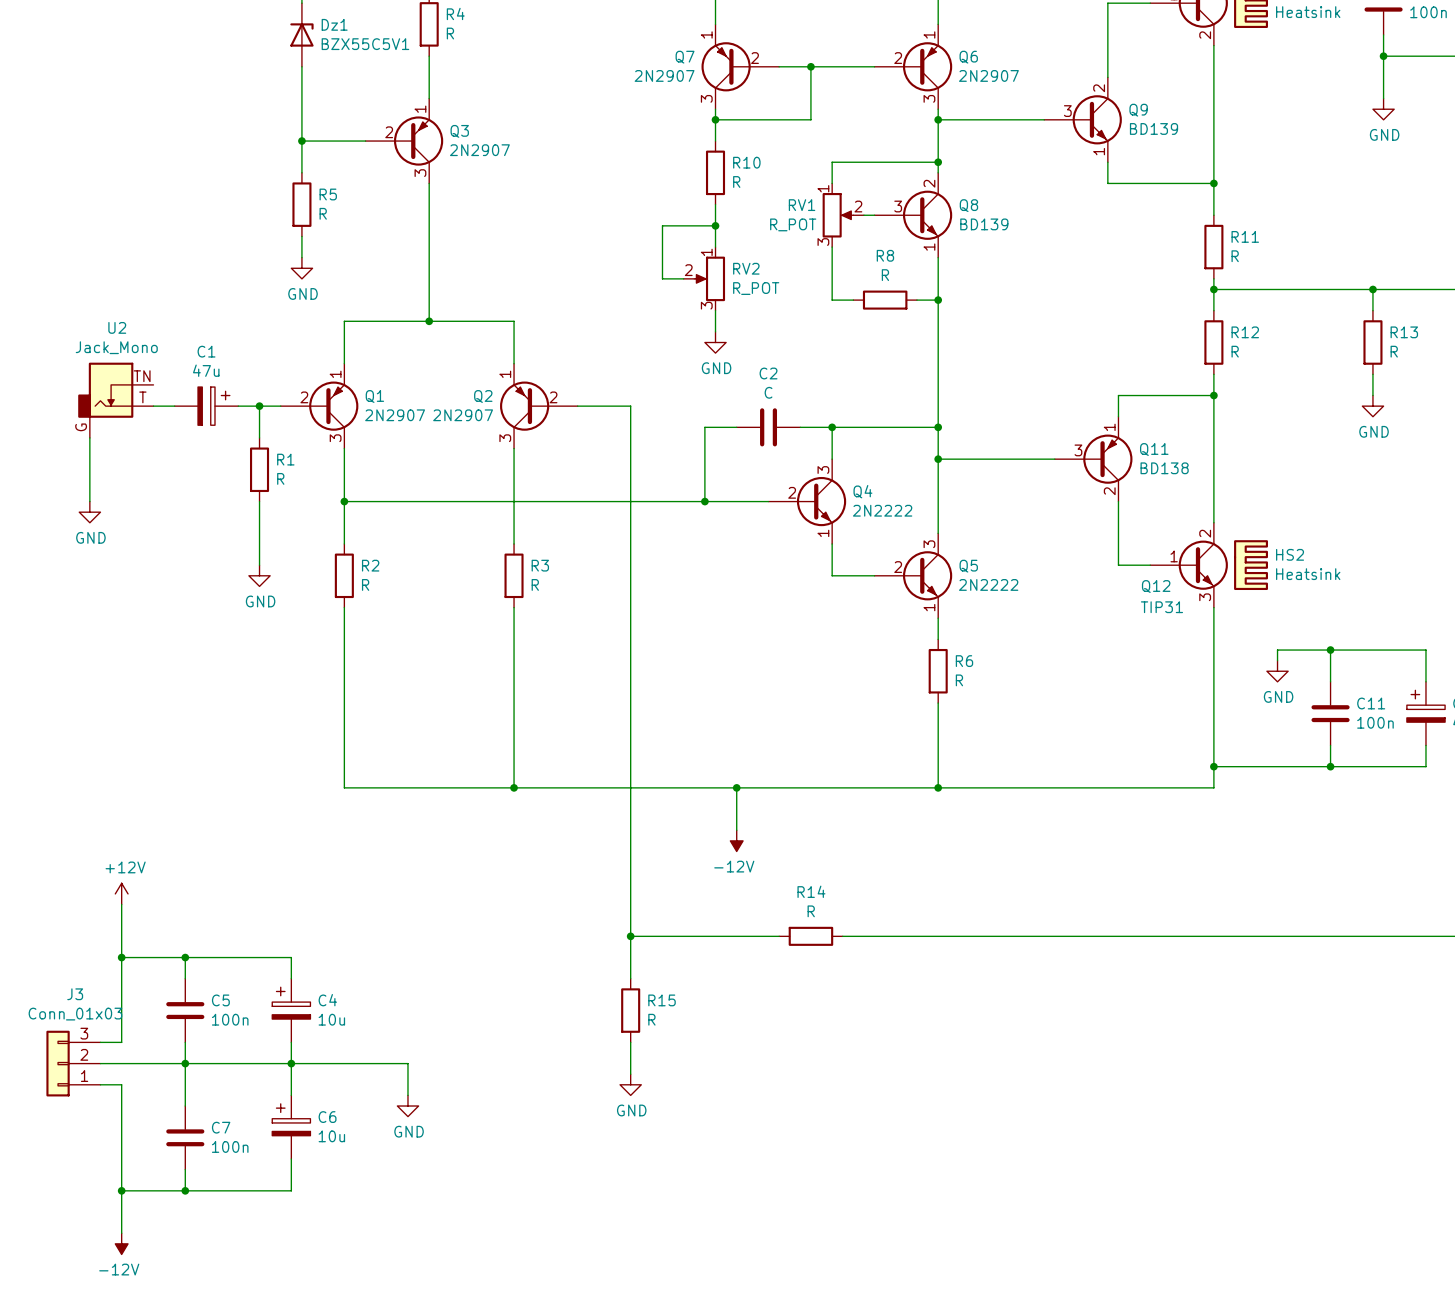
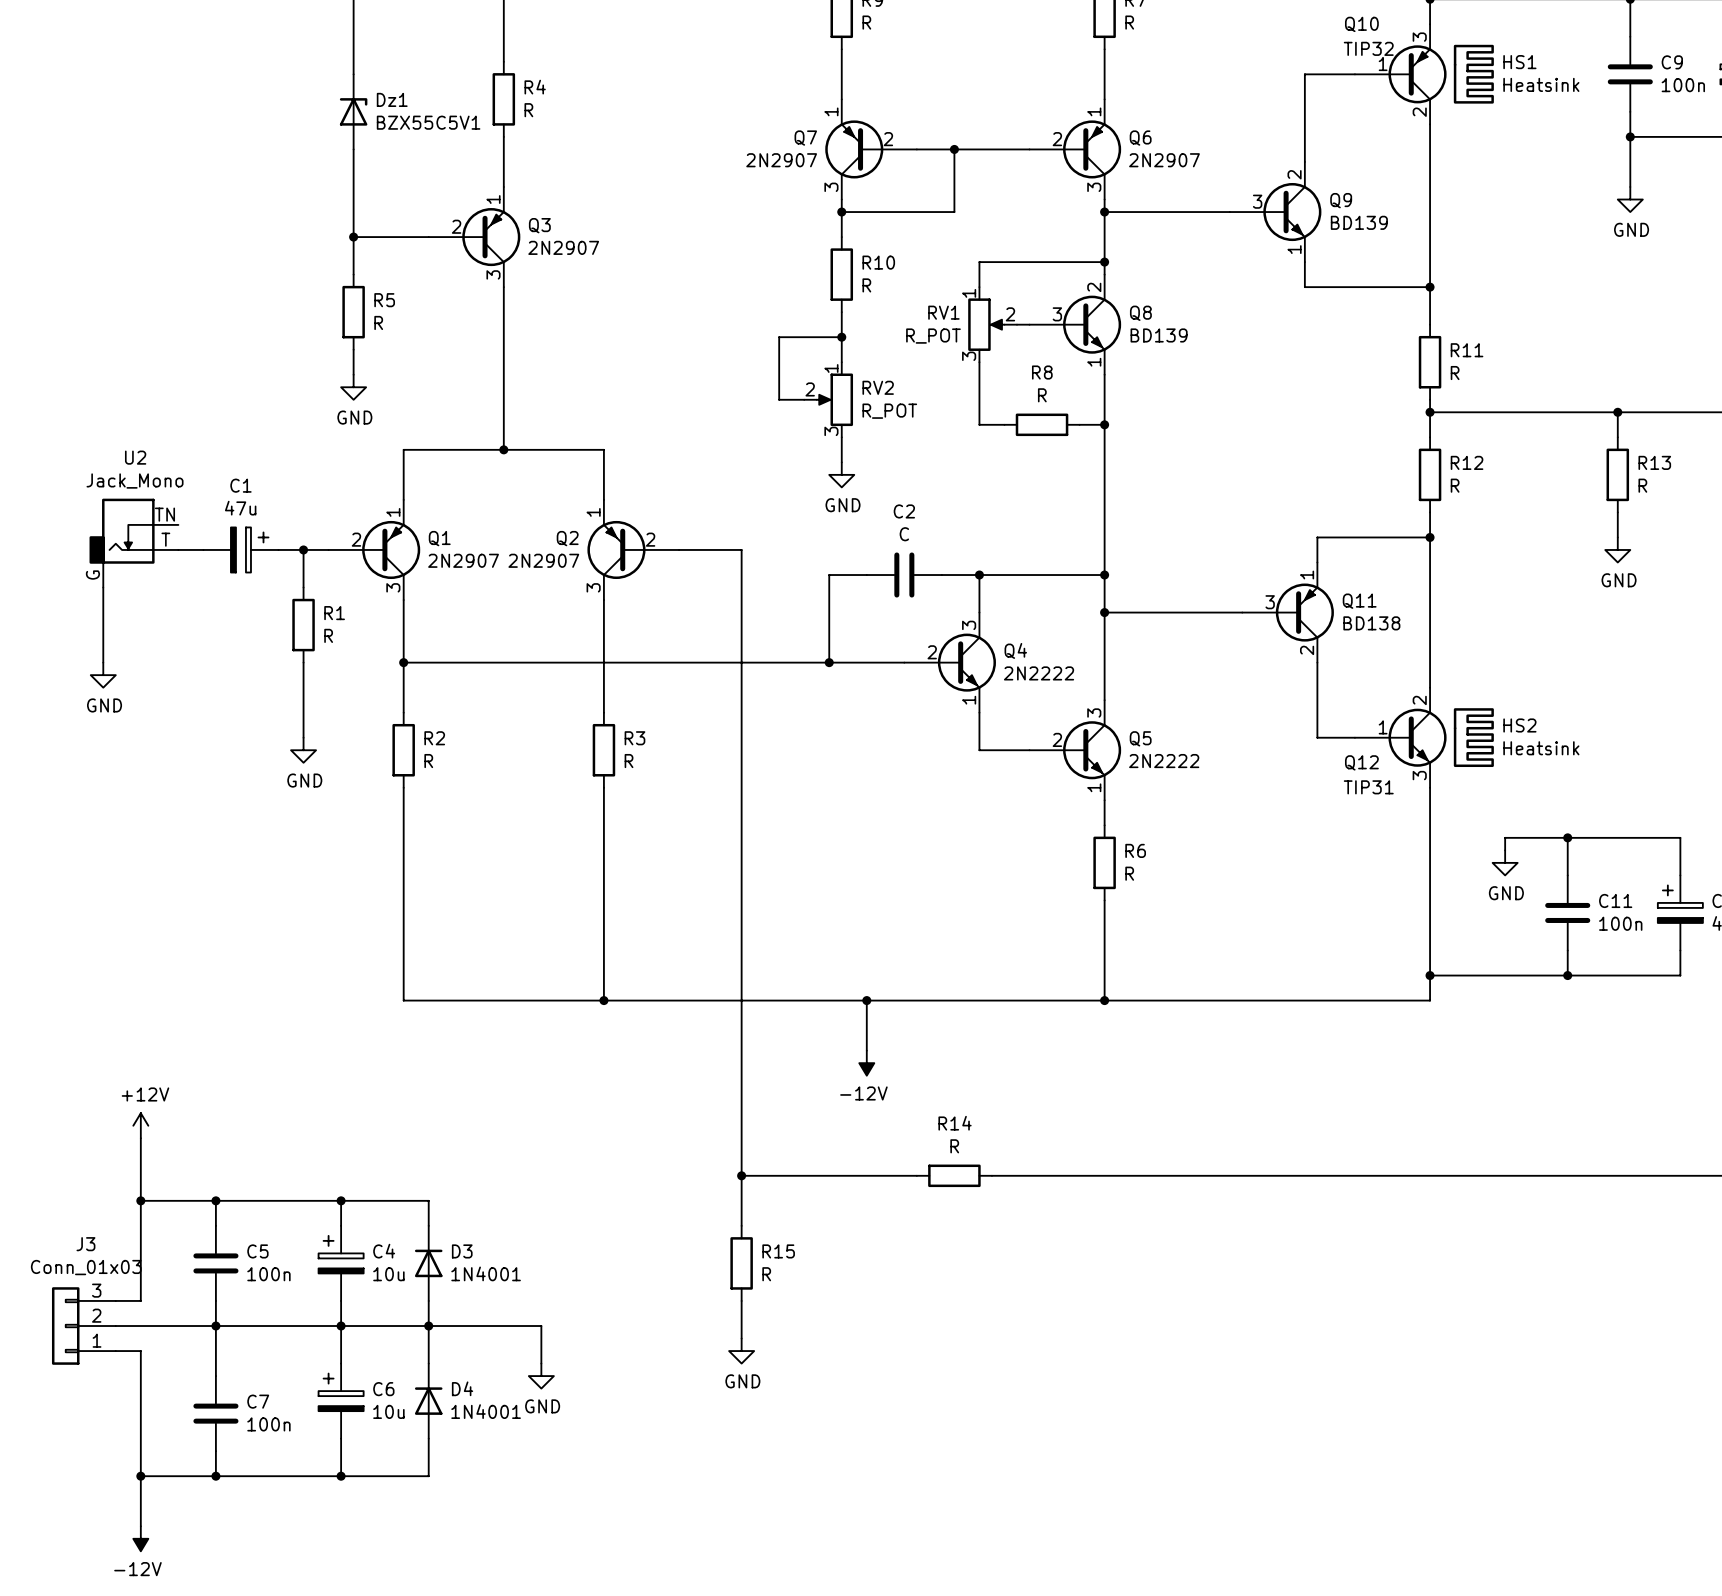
wire: none -> (341, 1200) (428, 1200) (428, 1225)
junction: none -> (341, 1200)
D3: none -> 1N4001 (428, 1263)
wire: none -> (428, 1300) (428, 1363)
junction: none -> (428, 1326)
wire: (407, 1063) (407, 1095) -> (478, 1326) (541, 1326) (541, 1363)
power symbol position: GND (407, 1106) -> GND (541, 1376)
D4: none -> 1N4001 (428, 1401)
wire: none -> (428, 1438) (428, 1476) (341, 1476)
junction: none -> (341, 1476)

